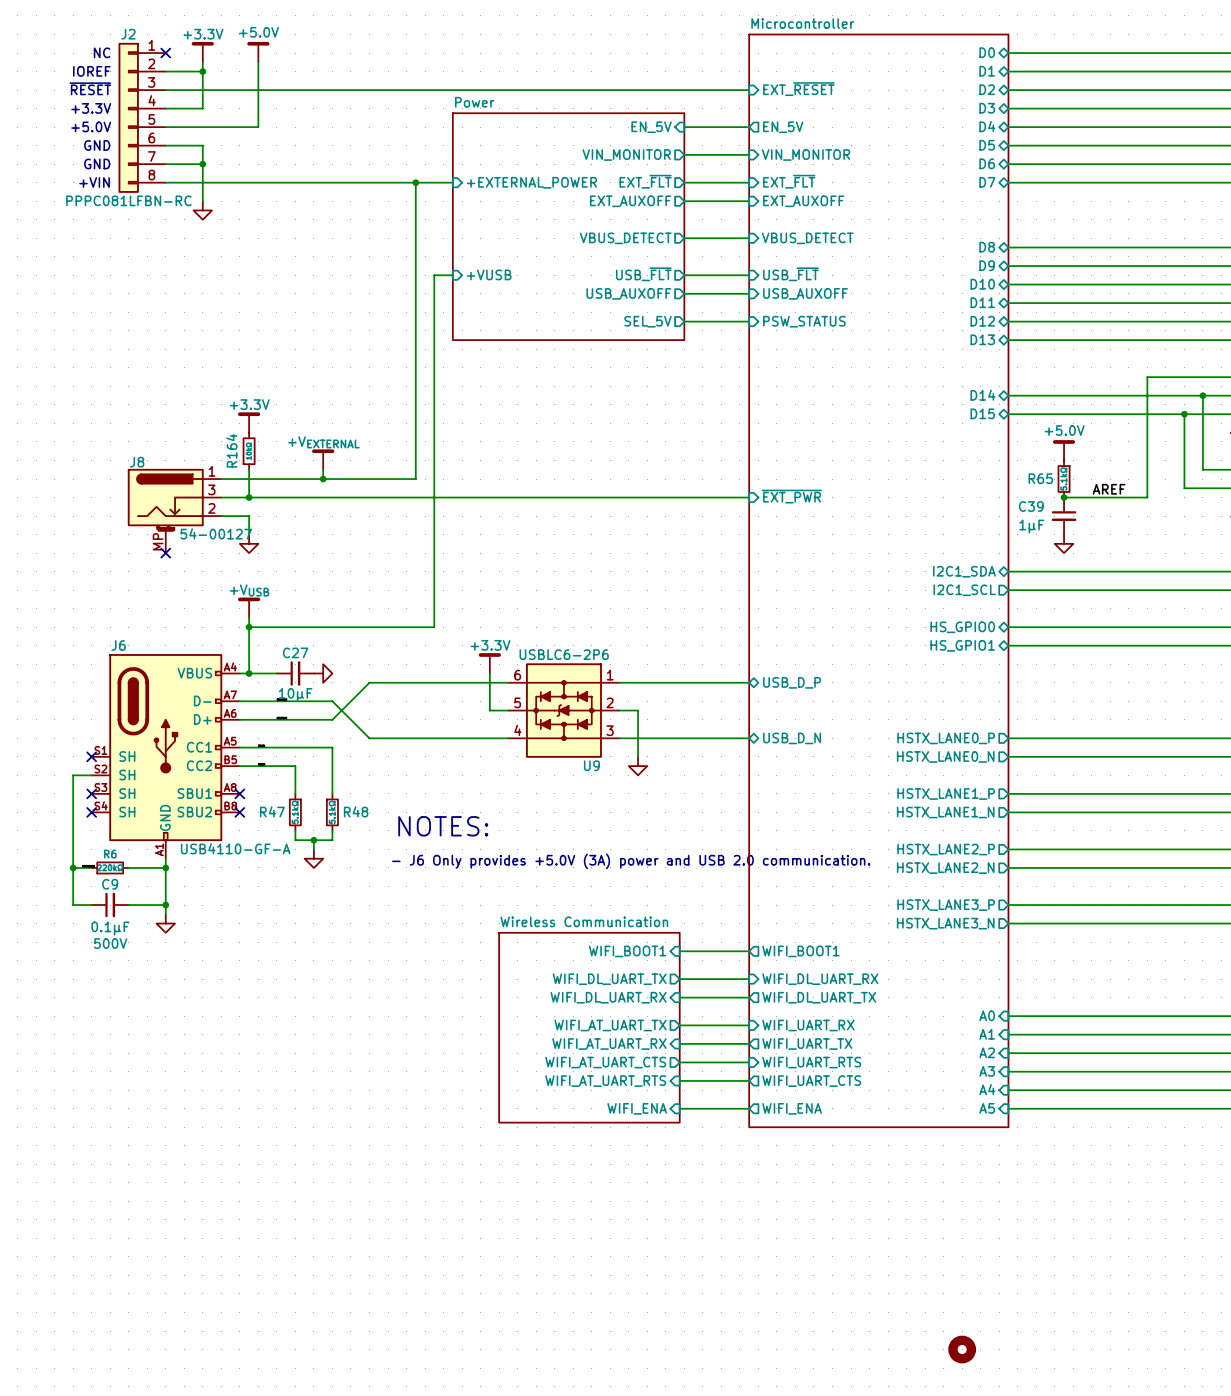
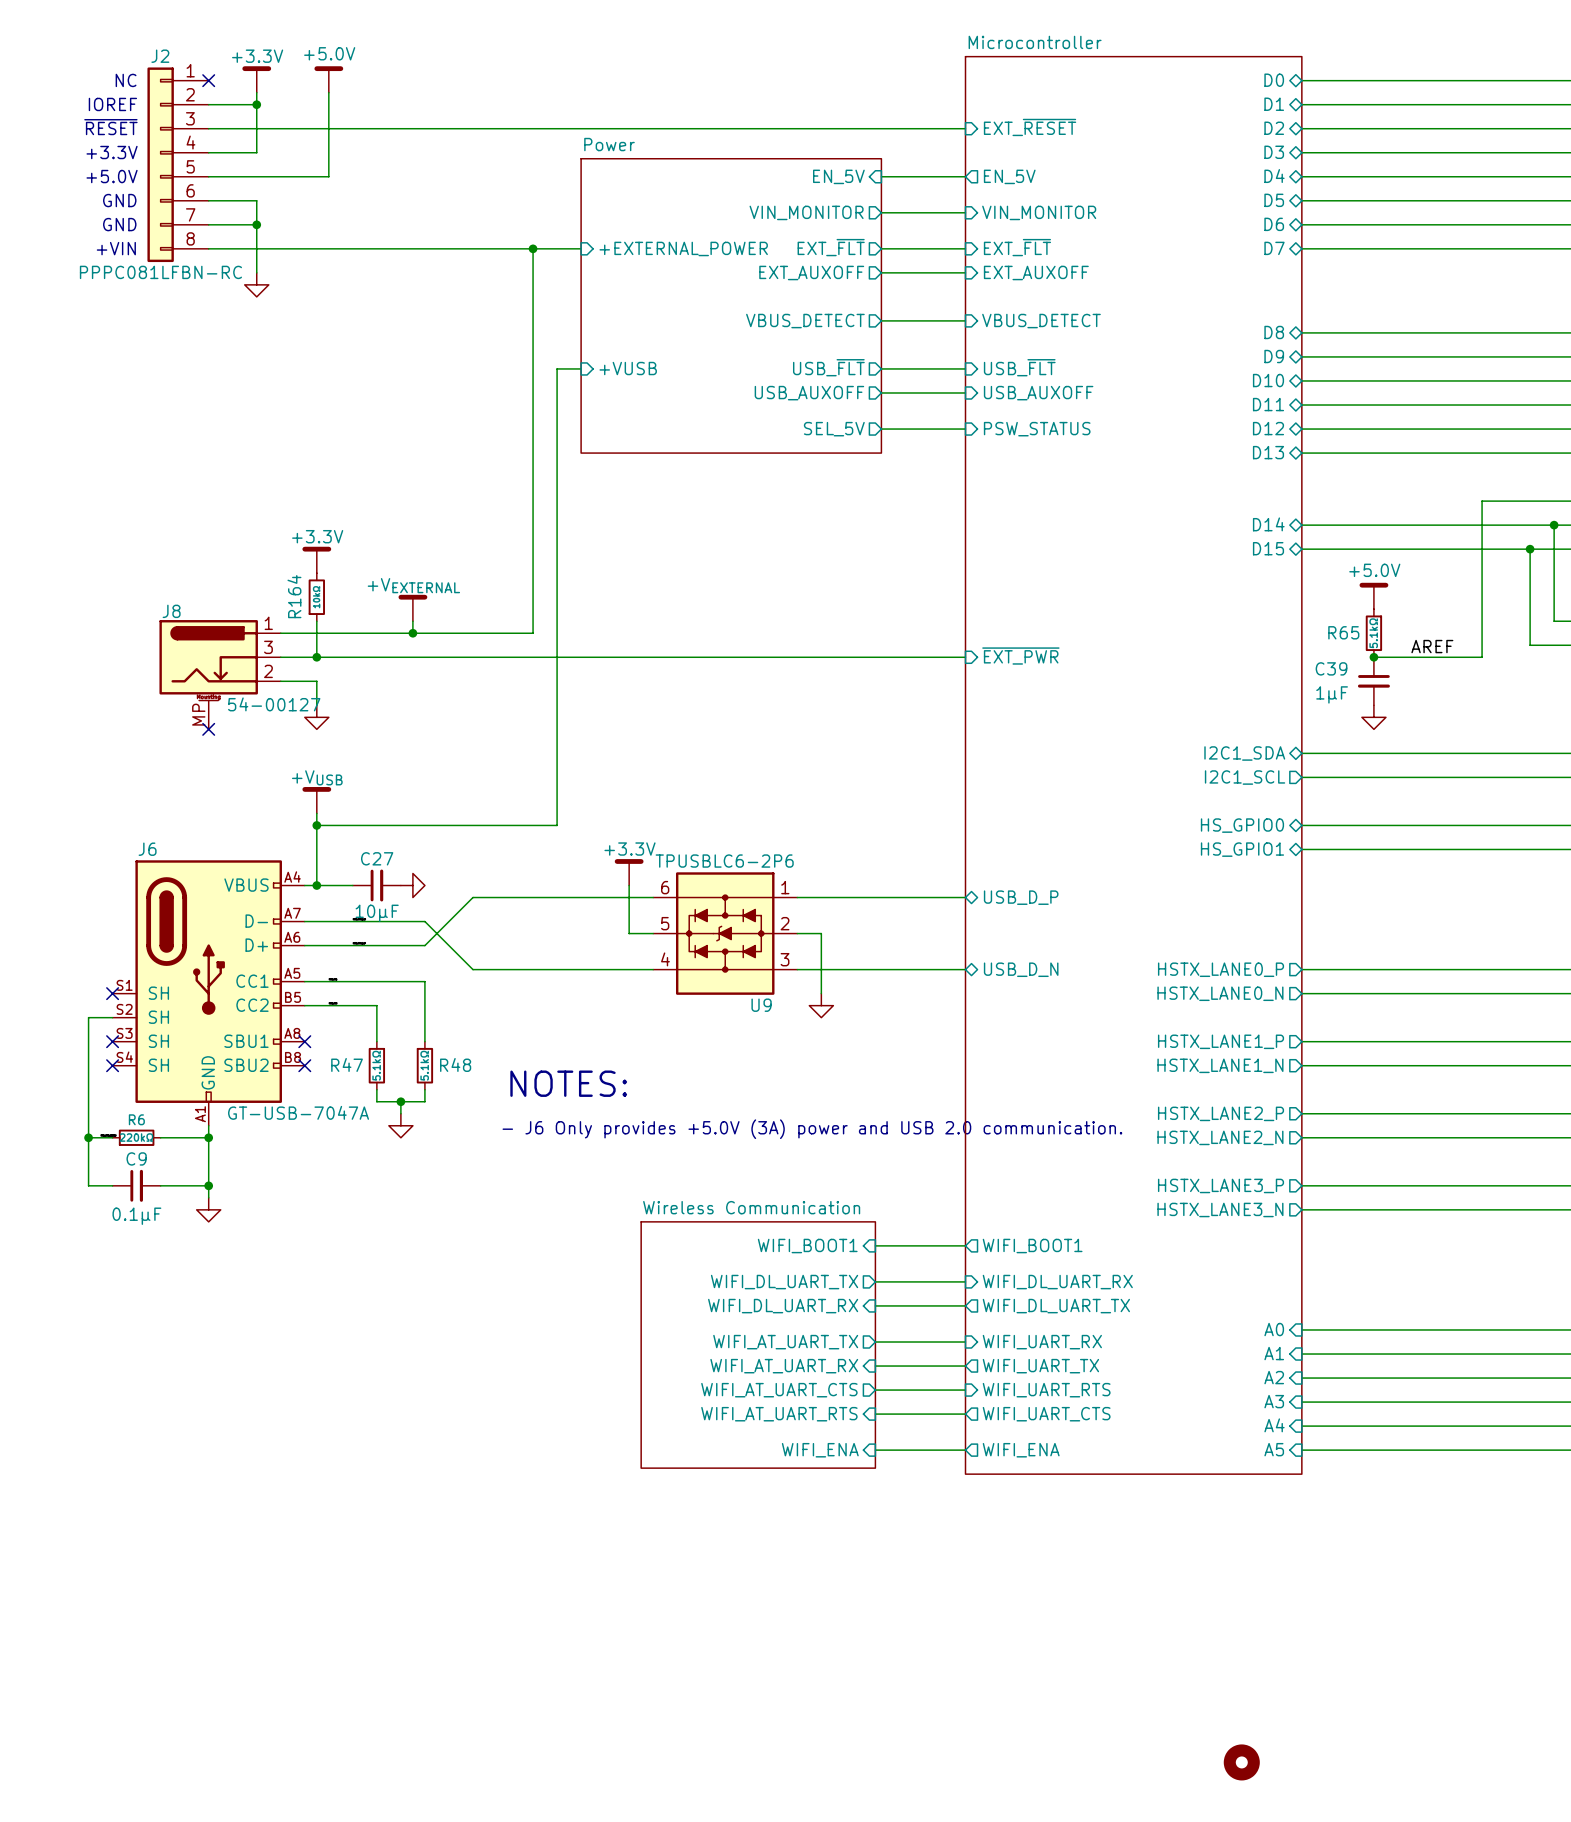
U9 value: USBLC6-2P6 (564, 654) -> TPUSBLC6-2P6 (724, 861)
J6 value: USB4110-GF-A (235, 848) -> GT-USB-7047A (298, 1112)
C9 text: 500V (110, 943) -> none

